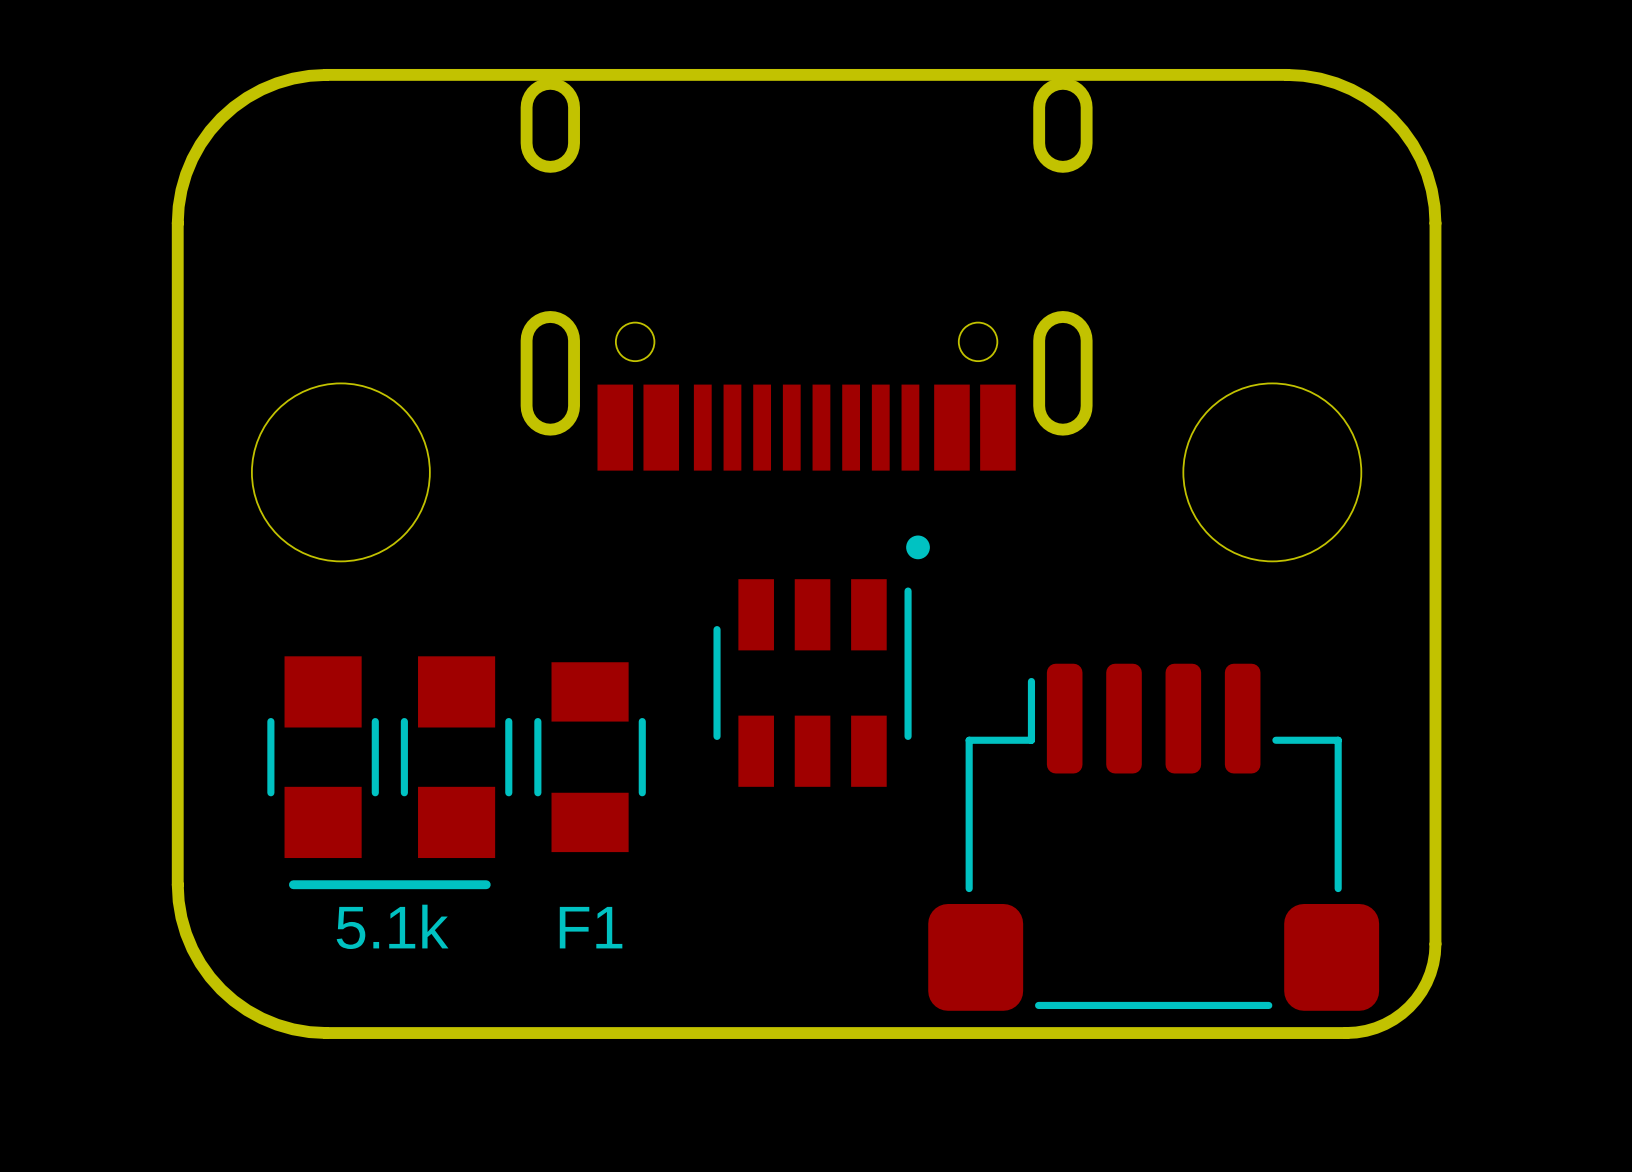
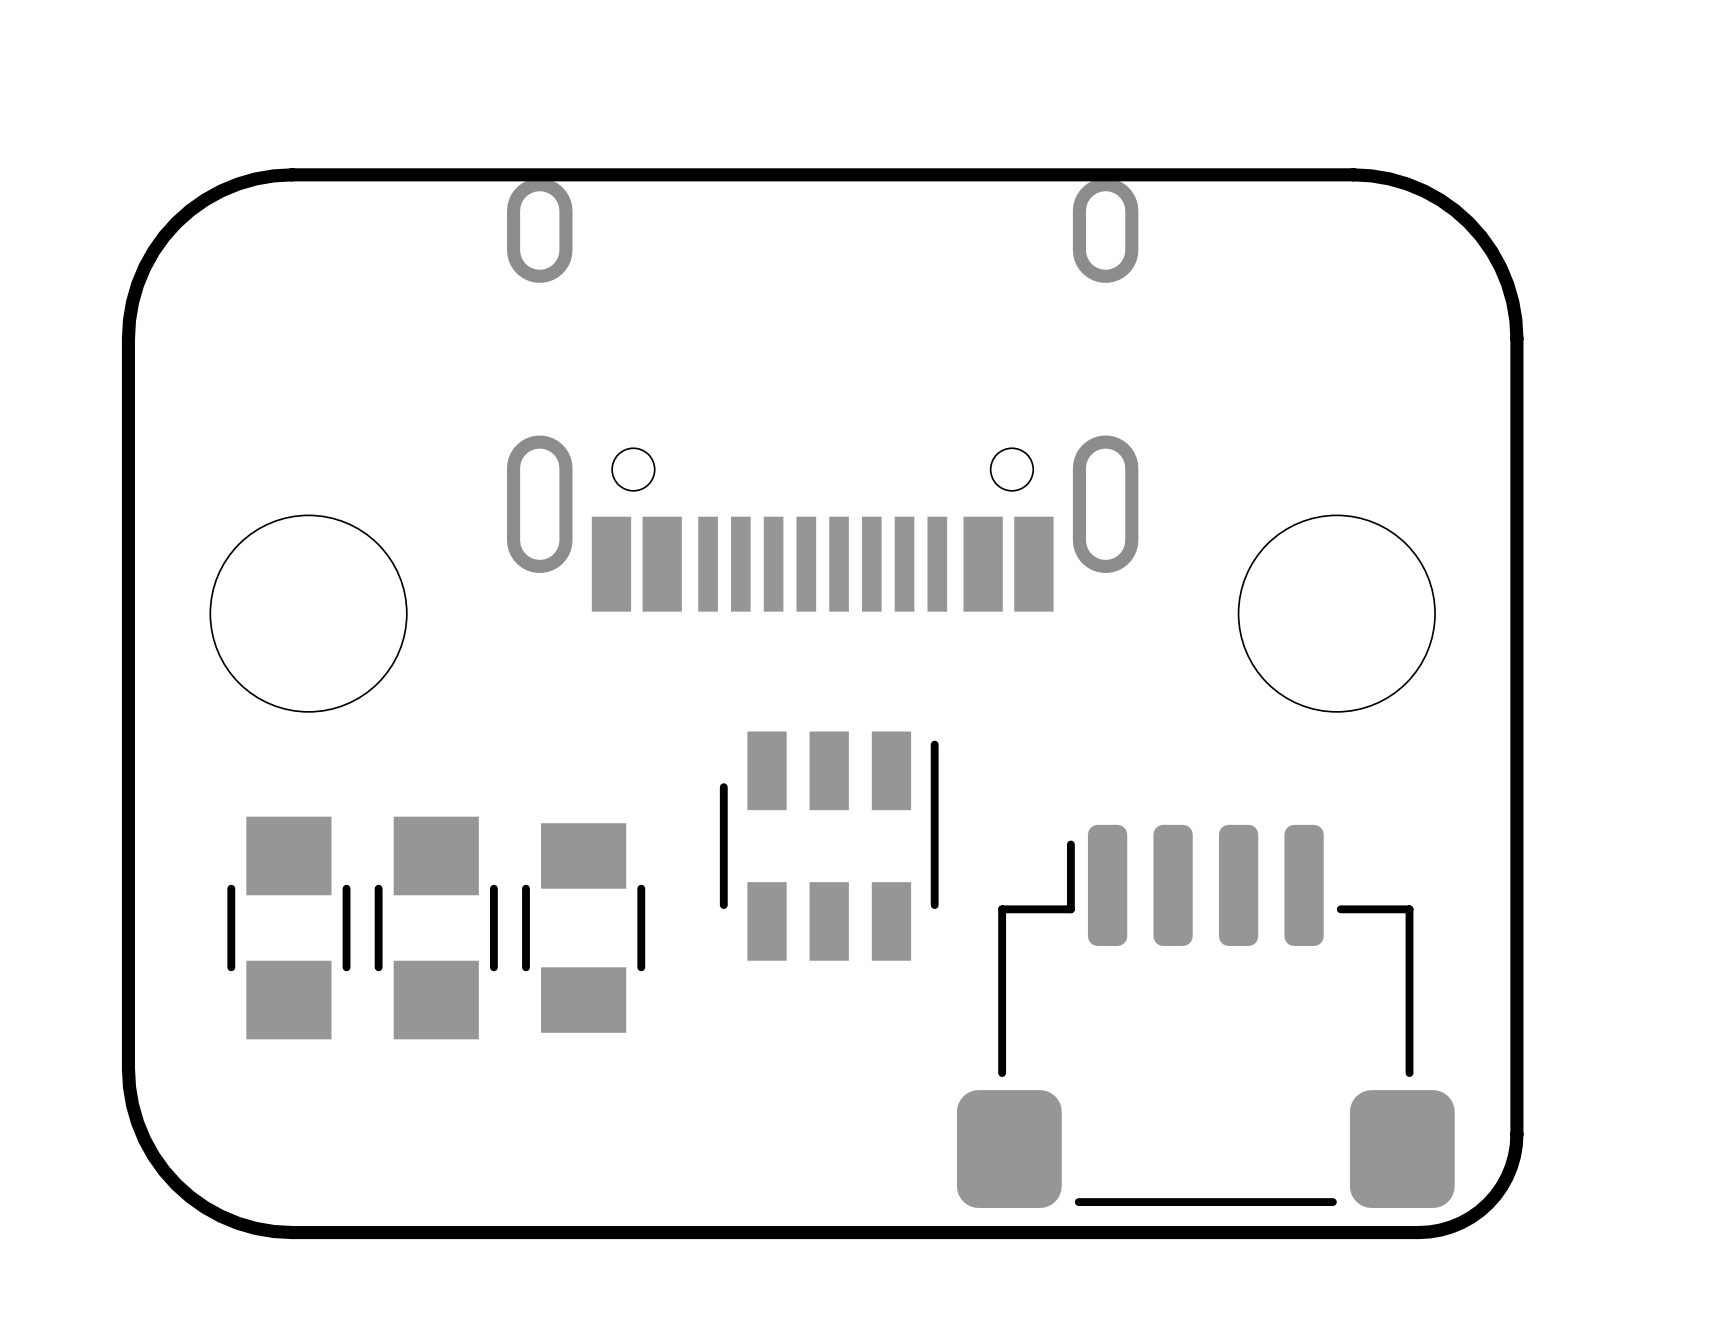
part footprint: [713, 535, 930, 787] -> [719, 731, 939, 961]
line: (293, 884) (486, 884) -> none
part value: 5.1k (392, 926) -> none
F1 name: F1 (591, 927) -> none

